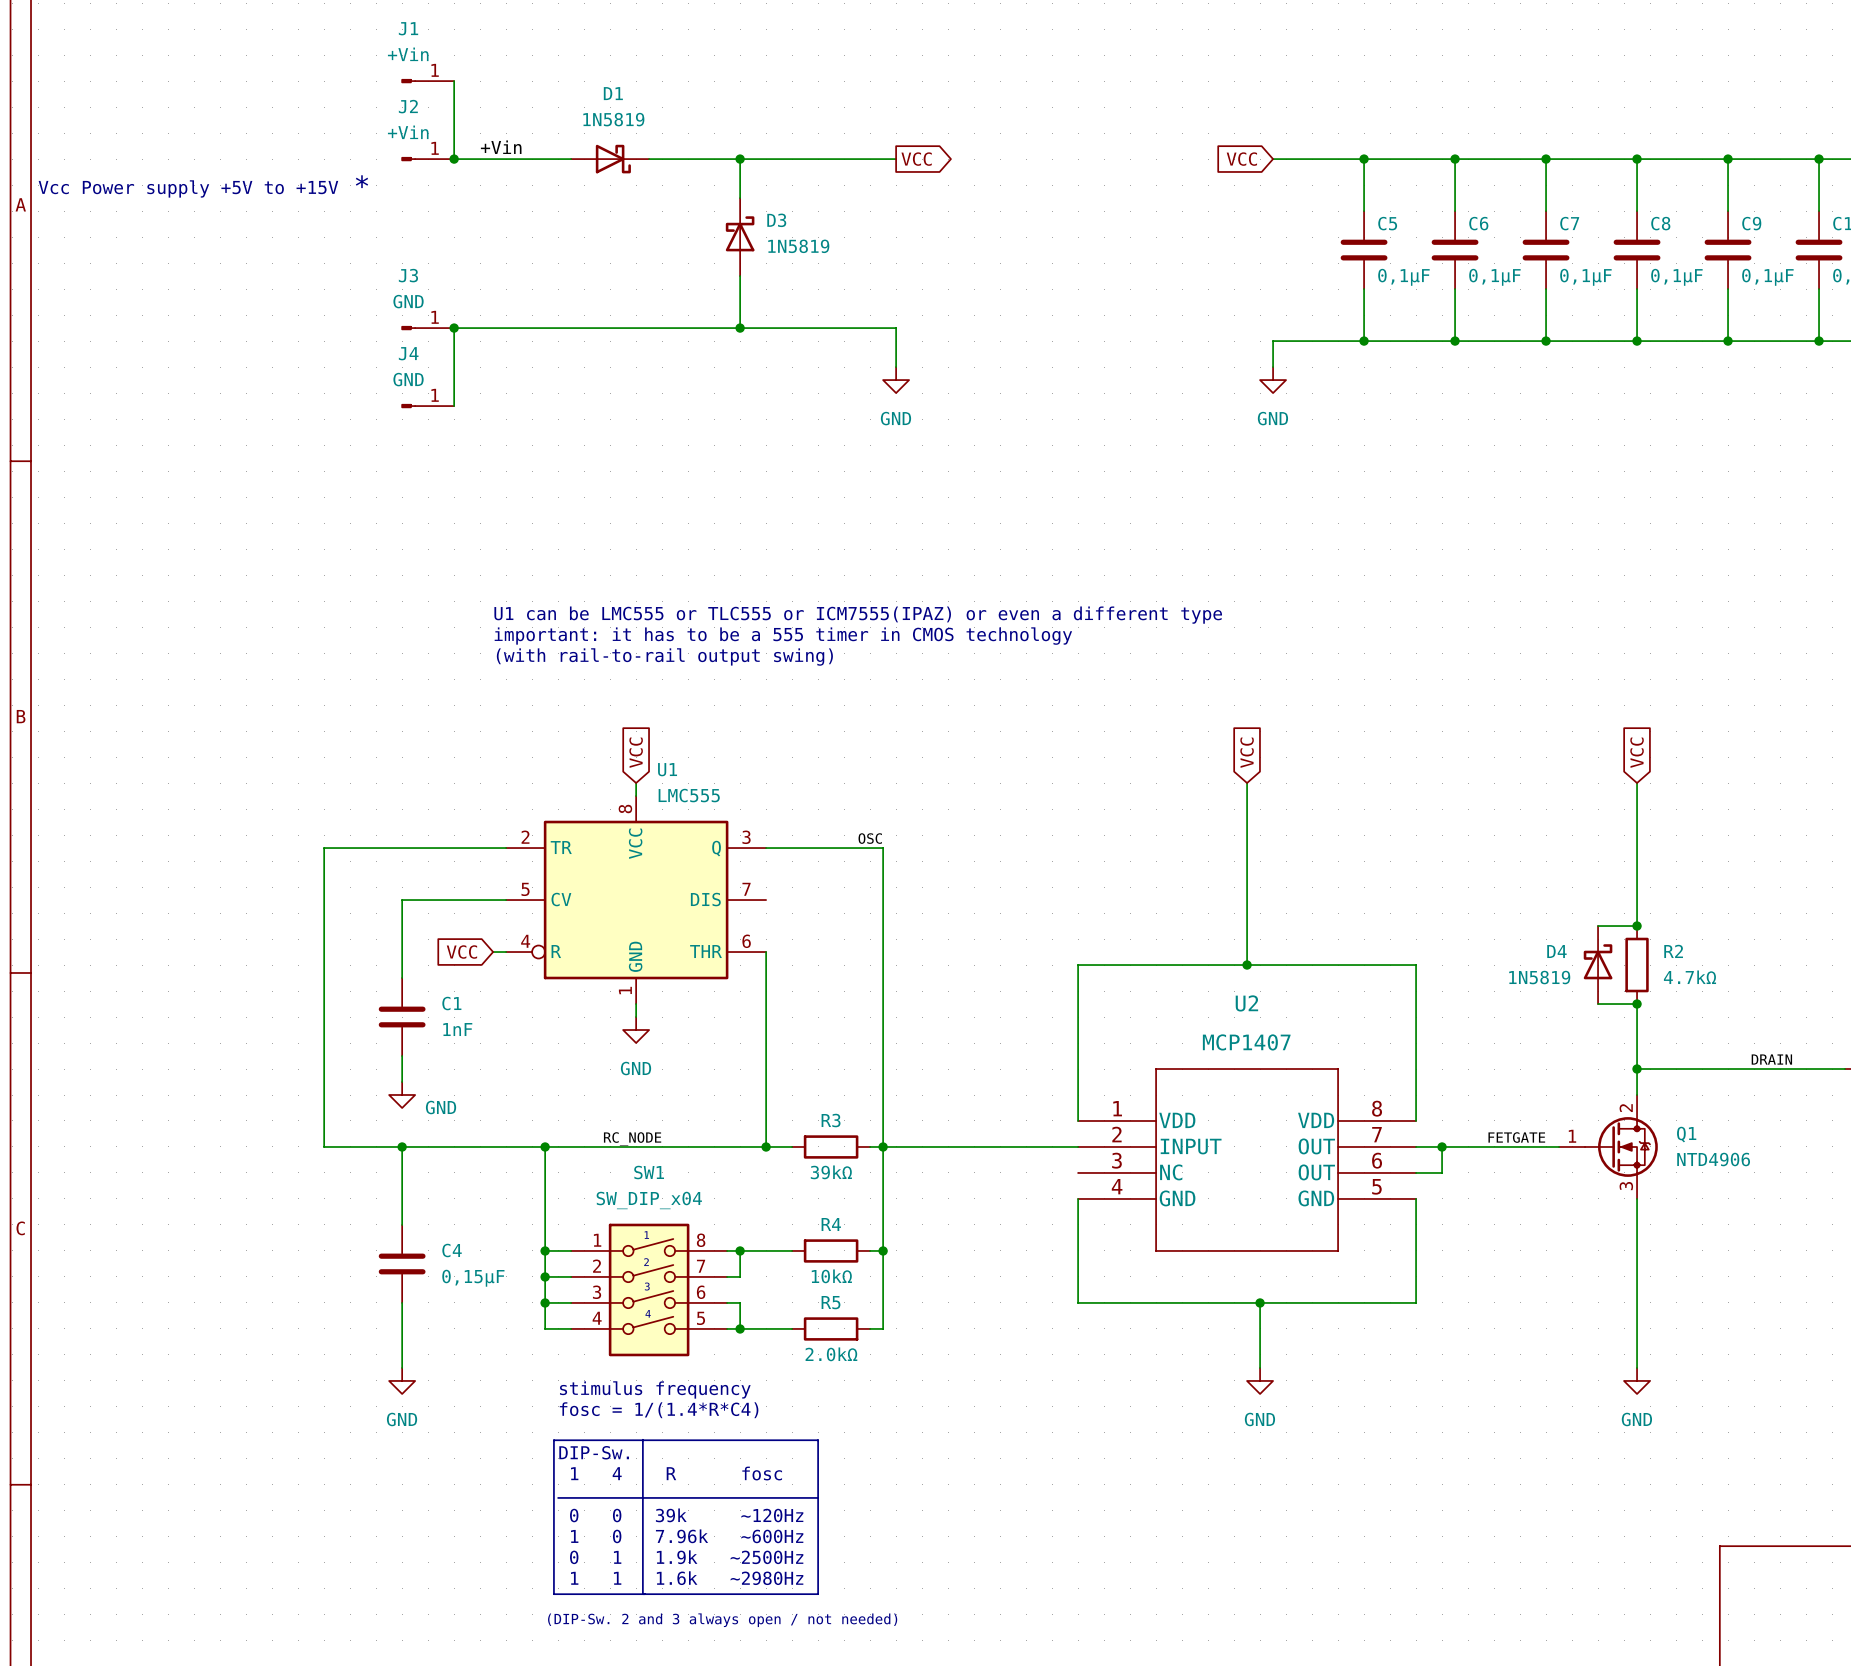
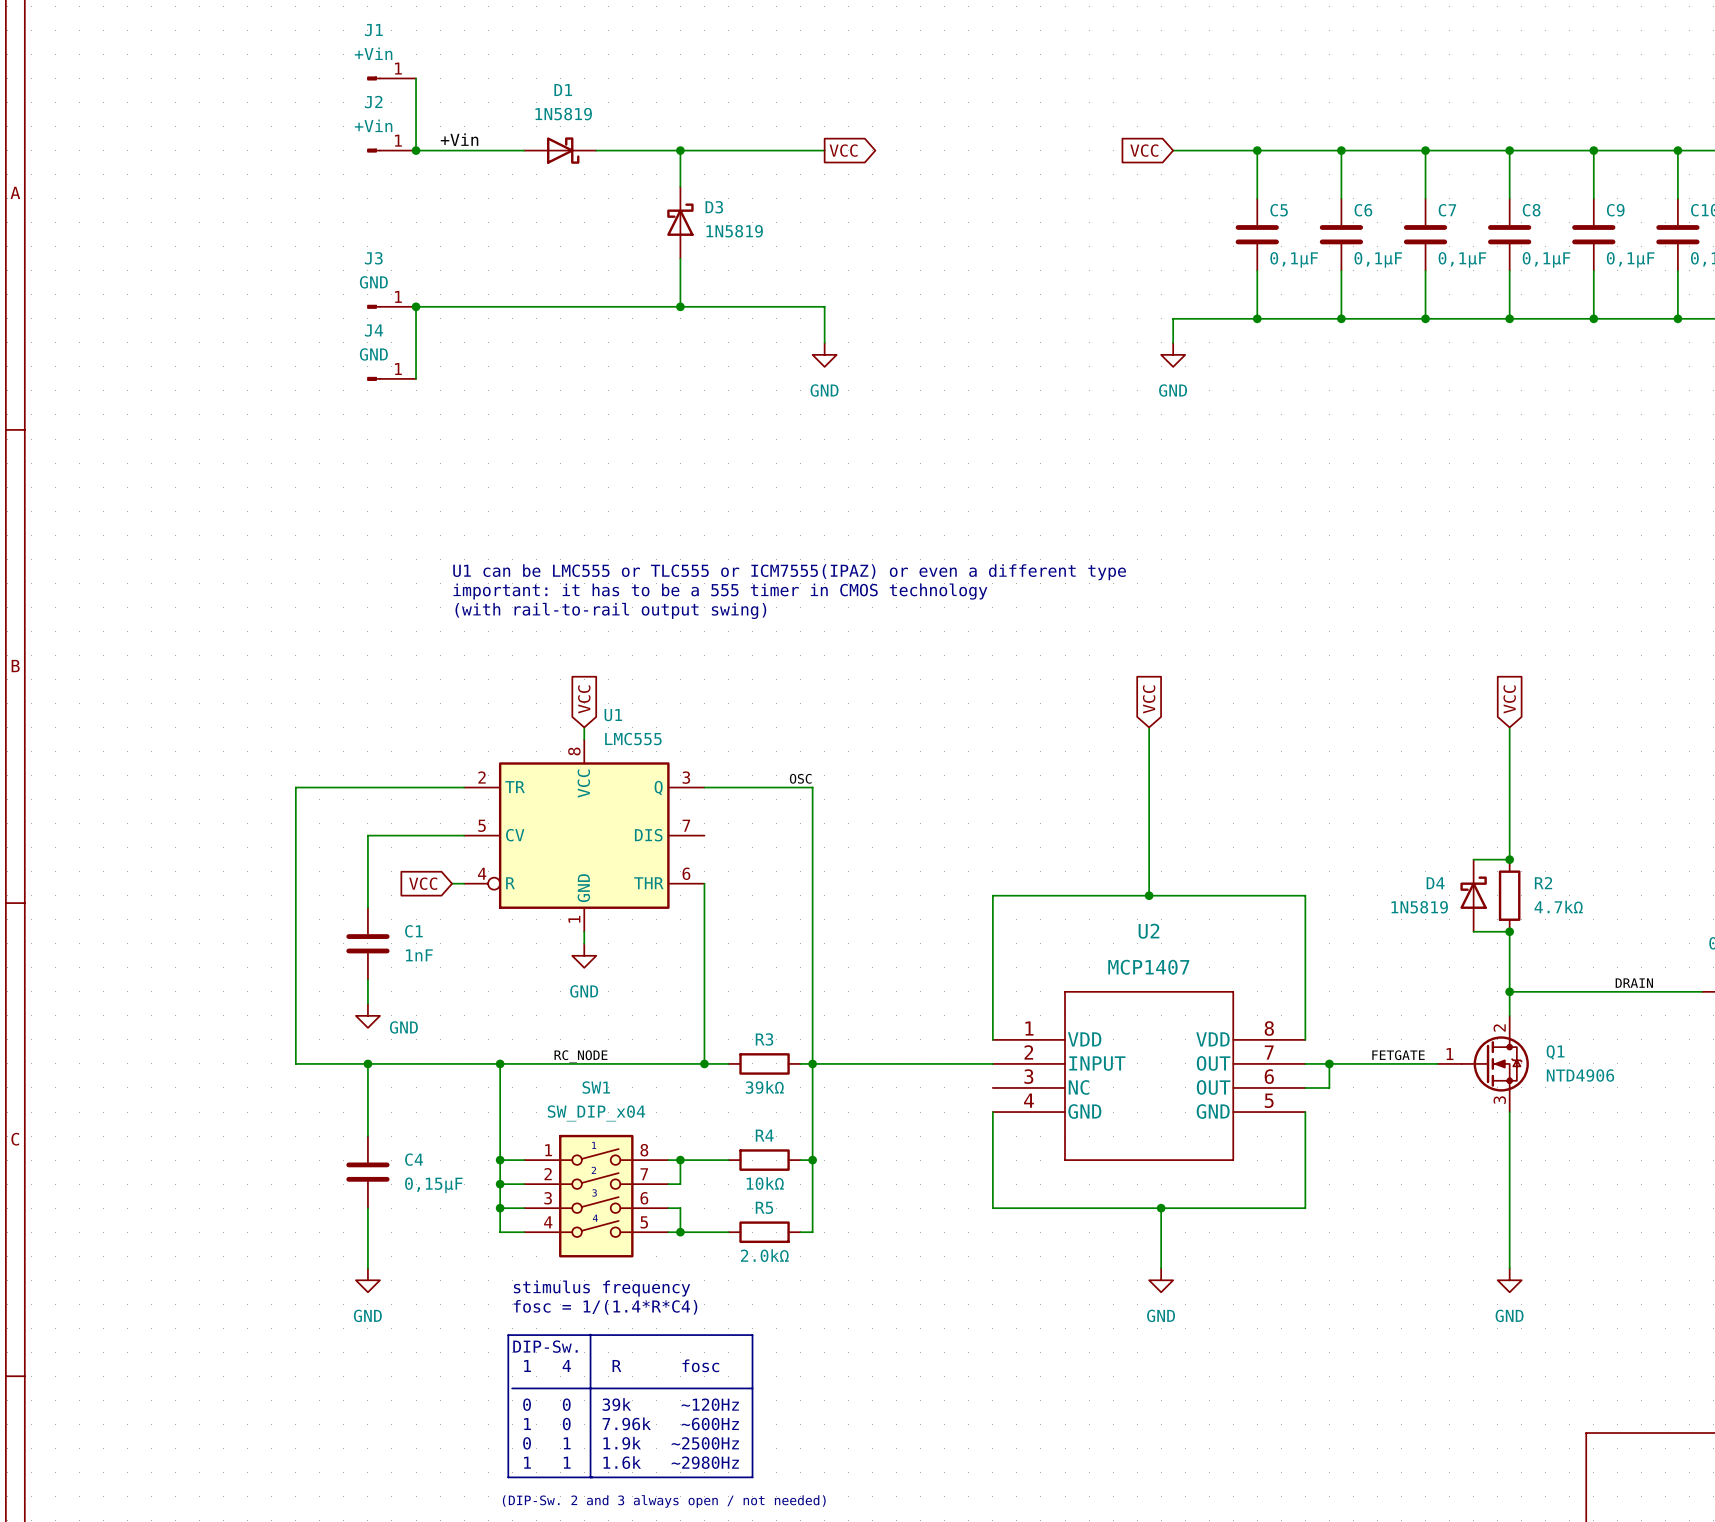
text: * (361, 181) -> none
text: Vcc Power supply +5V to +15V (188, 188) -> none

